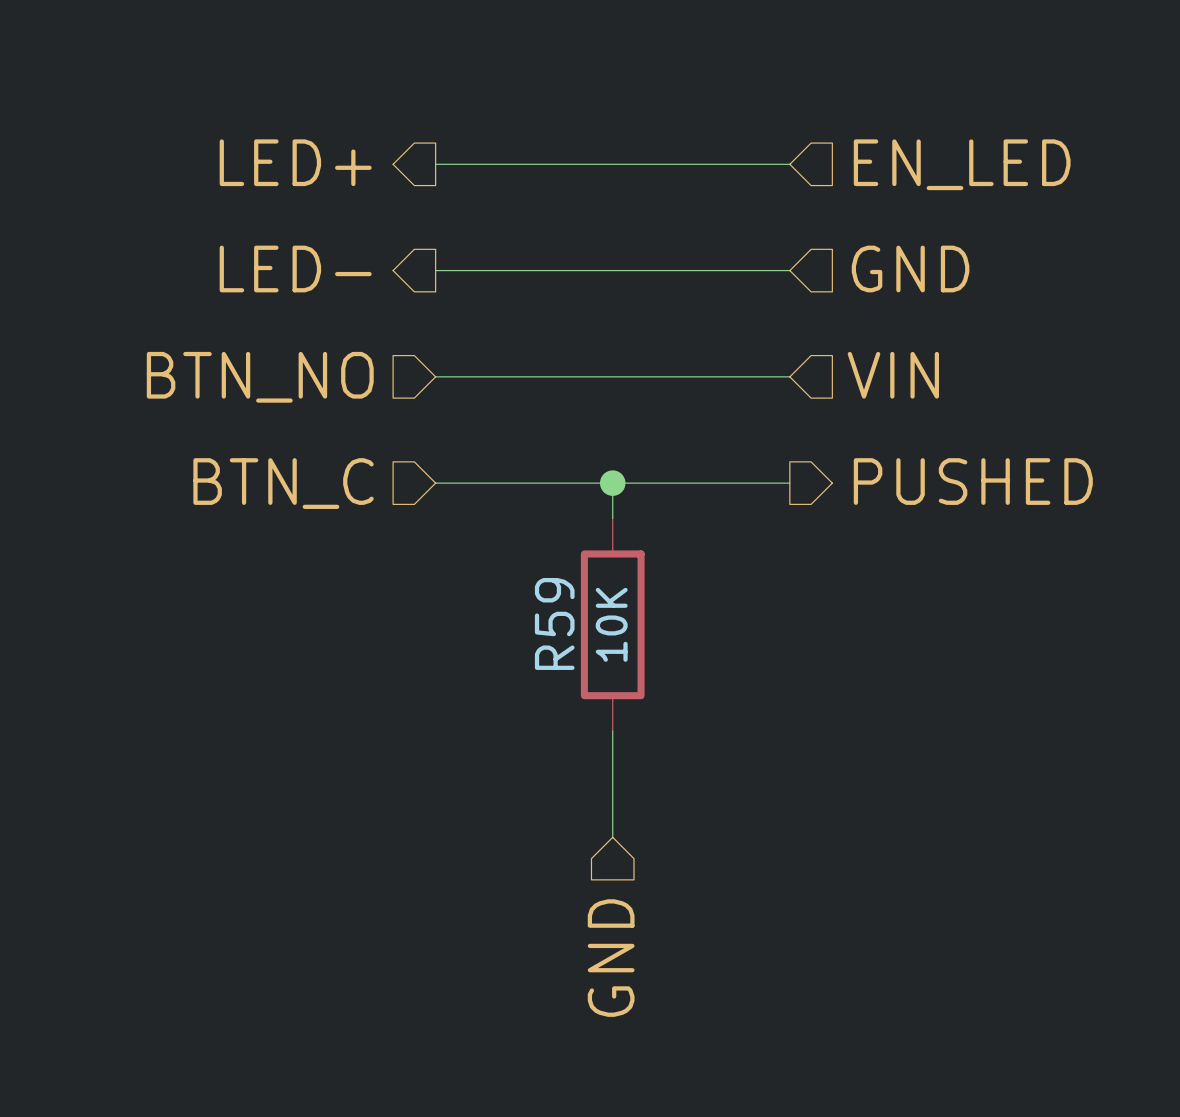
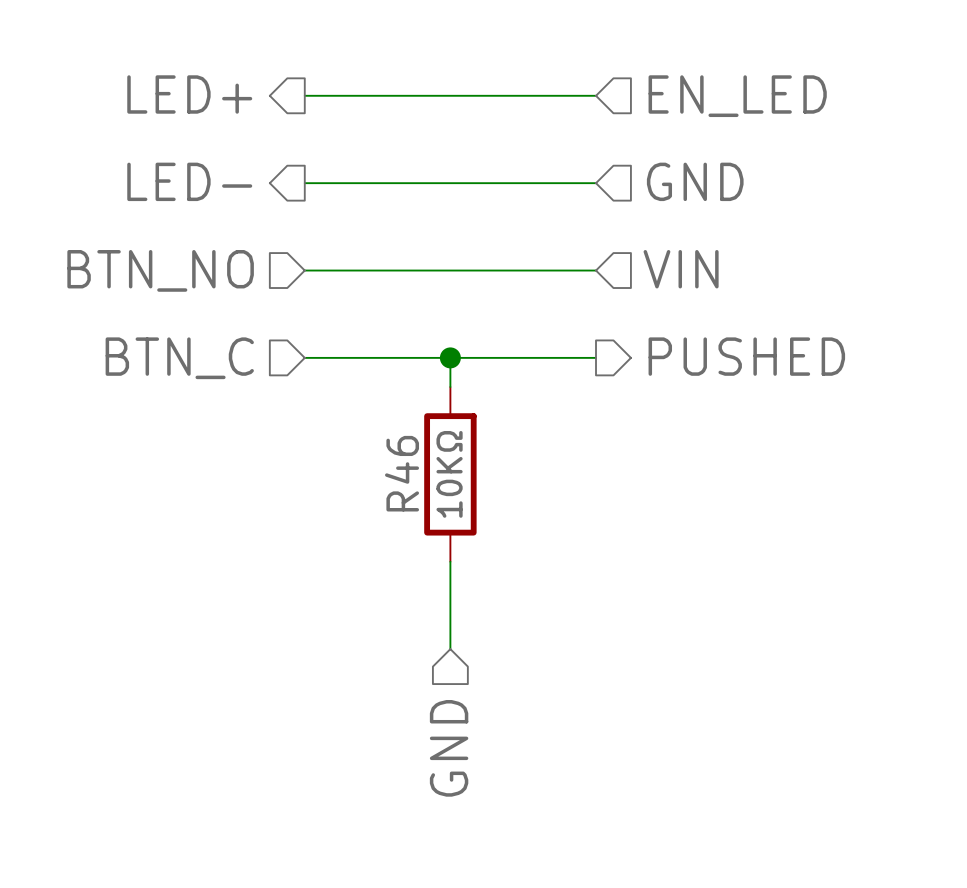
R59 name: R59 (554, 623) -> R46 (402, 473)
R59 value: 10K (611, 624) -> 10KΩ (449, 474)

